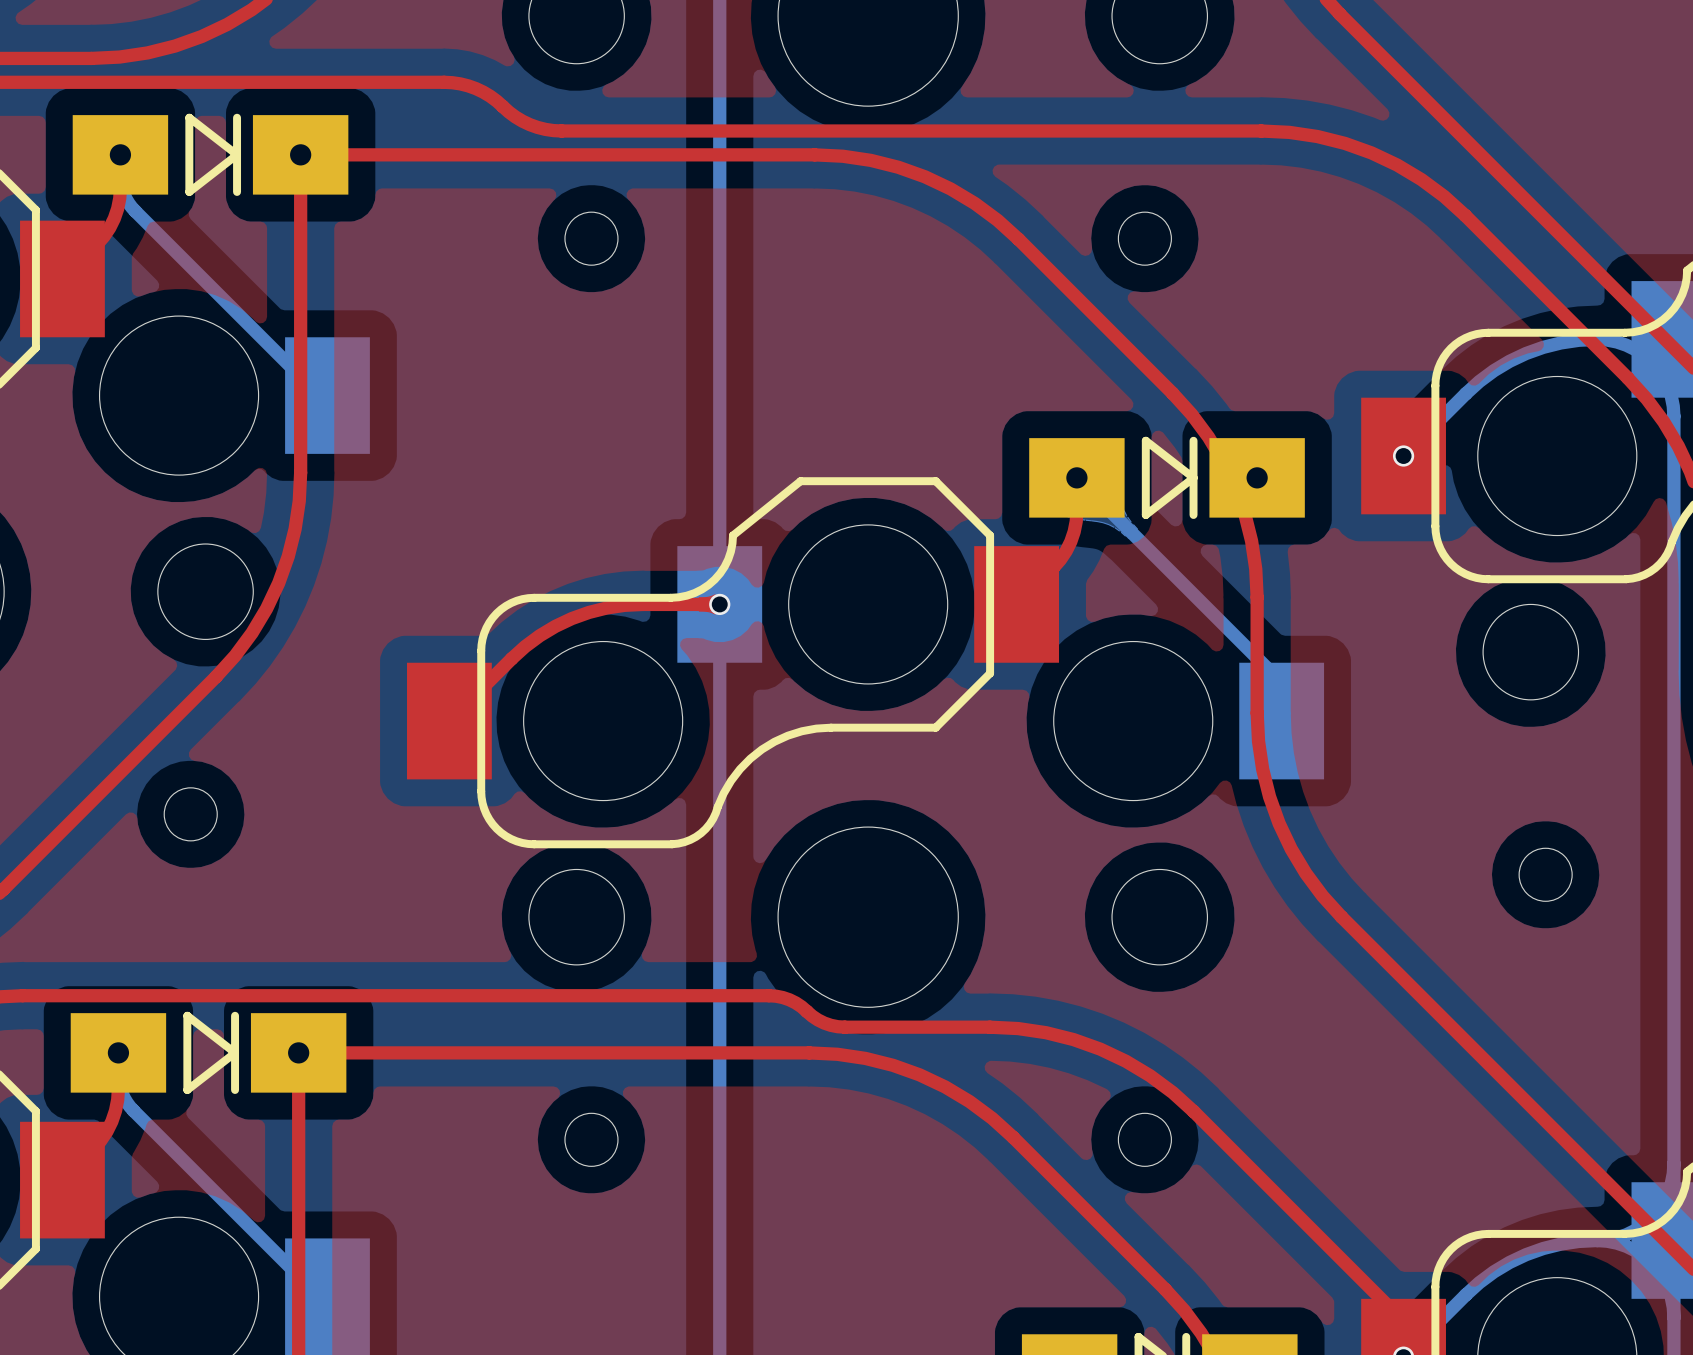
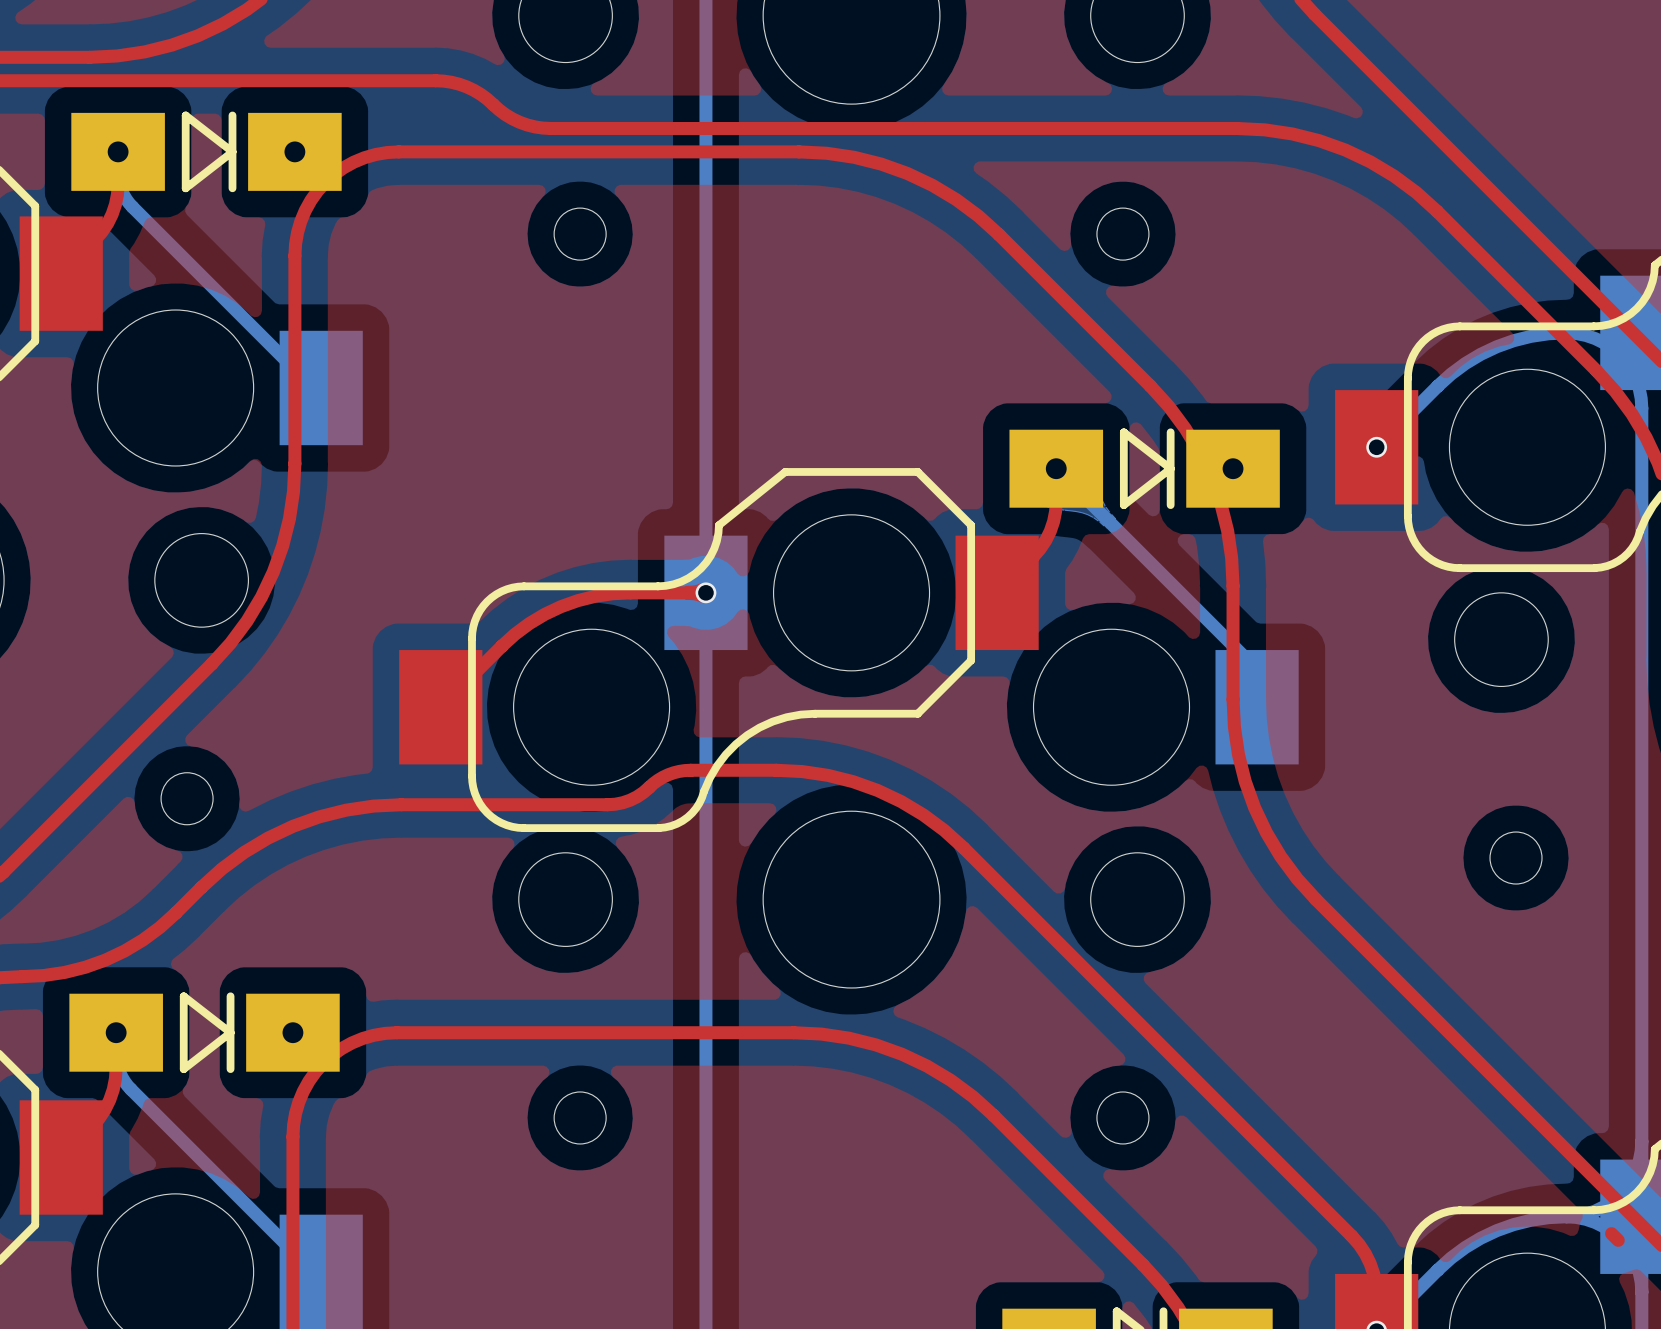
top track: (406, 154) (300, 154) (300, 260) -> (398, 151) (364, 157) (343, 167) (325, 182) (305, 210) (297, 232) (294, 255)
top track: (22, 995) (768, 995) (789, 999) (818, 1019) (837, 1026) (989, 1027) (1046, 1032) (1100, 1049) (1125, 1061) (1172, 1092) (1390, 1308) (1400, 1322) (1403, 1339) -> (22, 976) (64, 972) (105, 960) (124, 950) (160, 927) (221, 868) (244, 852) (293, 826) (346, 810) (401, 804) (615, 804) (637, 796) (663, 777) (684, 770) (776, 770) (827, 775) (853, 781) (901, 801) (923, 814) (963, 847) (1351, 1236) (1365, 1253) (1373, 1274) (1376, 1313)
top track: (404, 1052) (298, 1052) (298, 1158) -> (396, 1032) (373, 1035) (351, 1043) (323, 1063) (303, 1091) (295, 1113) (292, 1136)
top track: none -> (1611, 1233) (1618, 1240)

